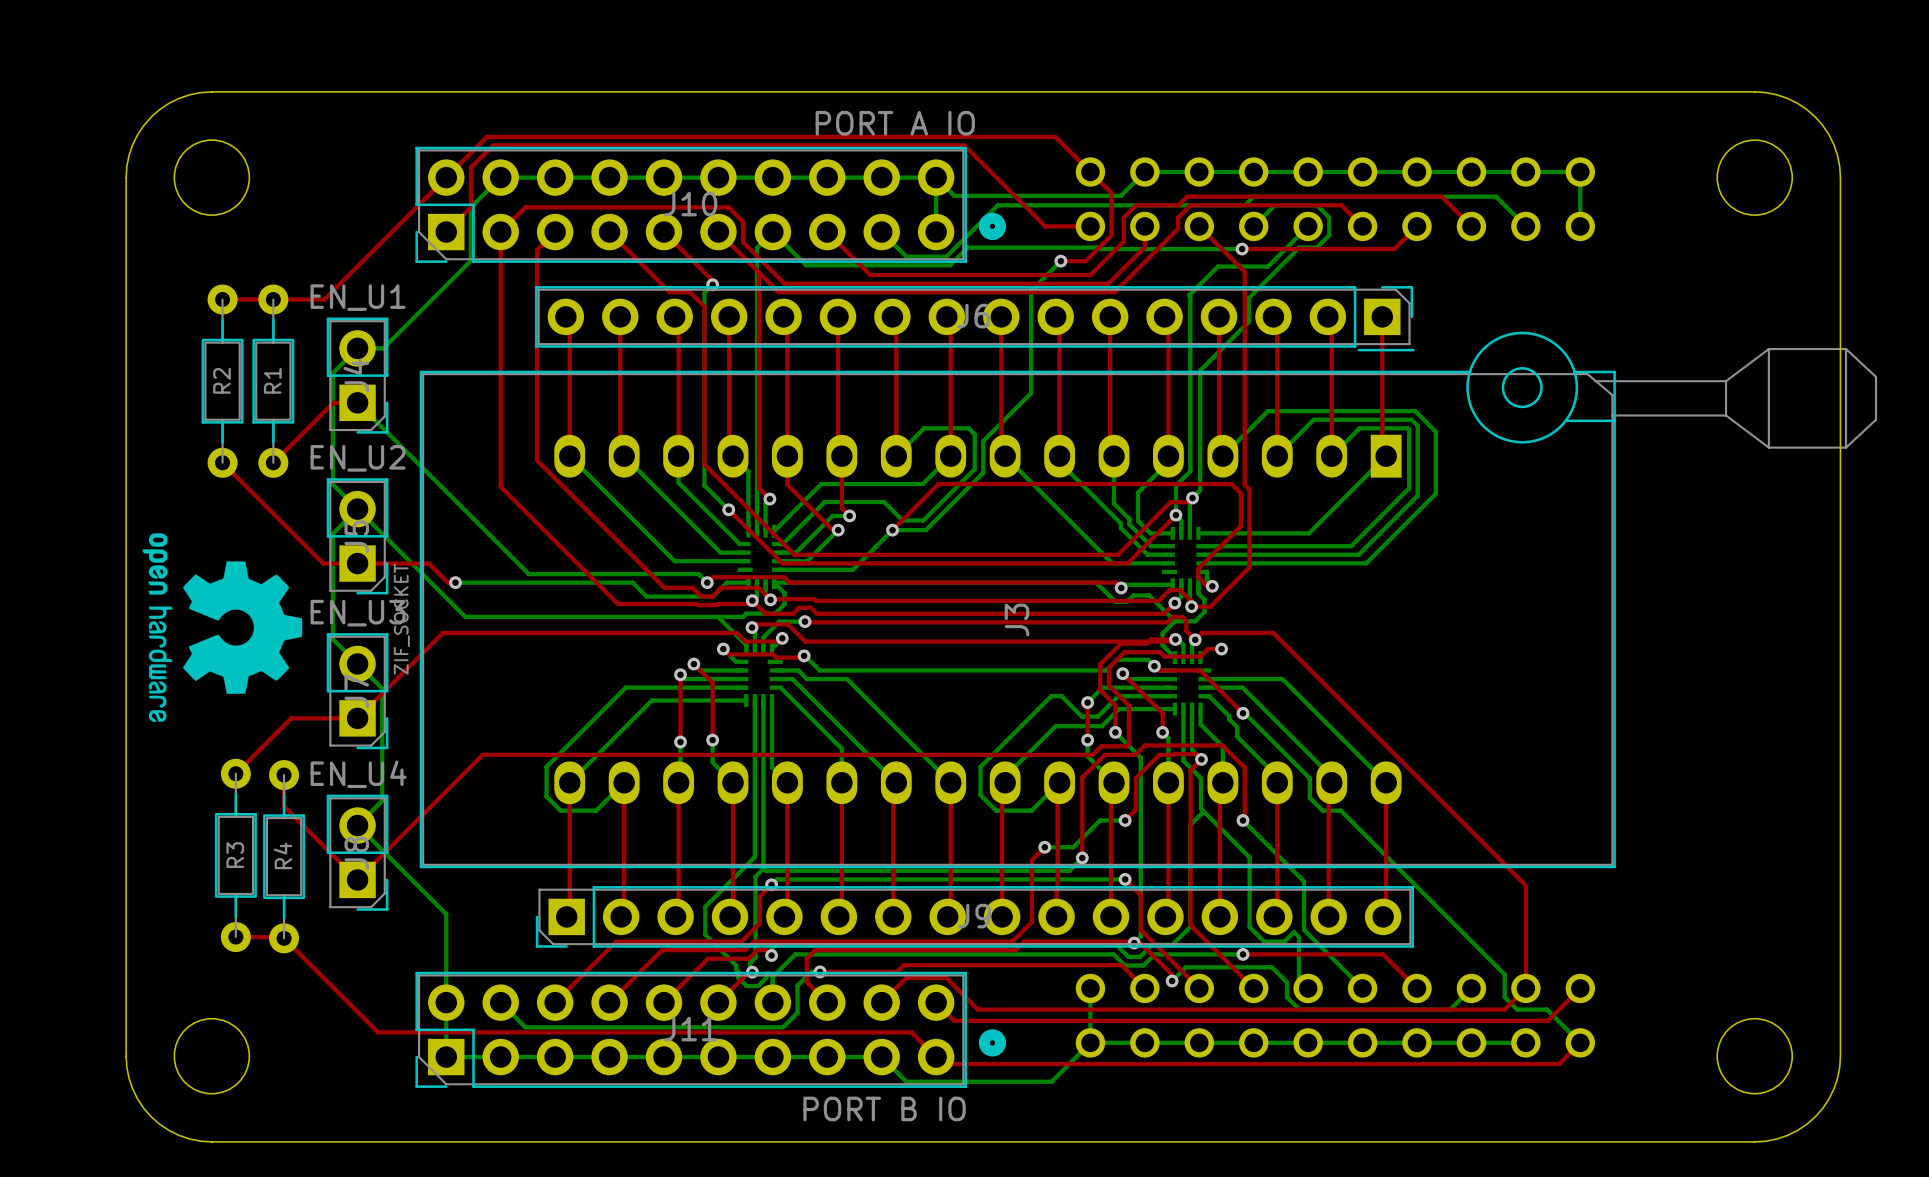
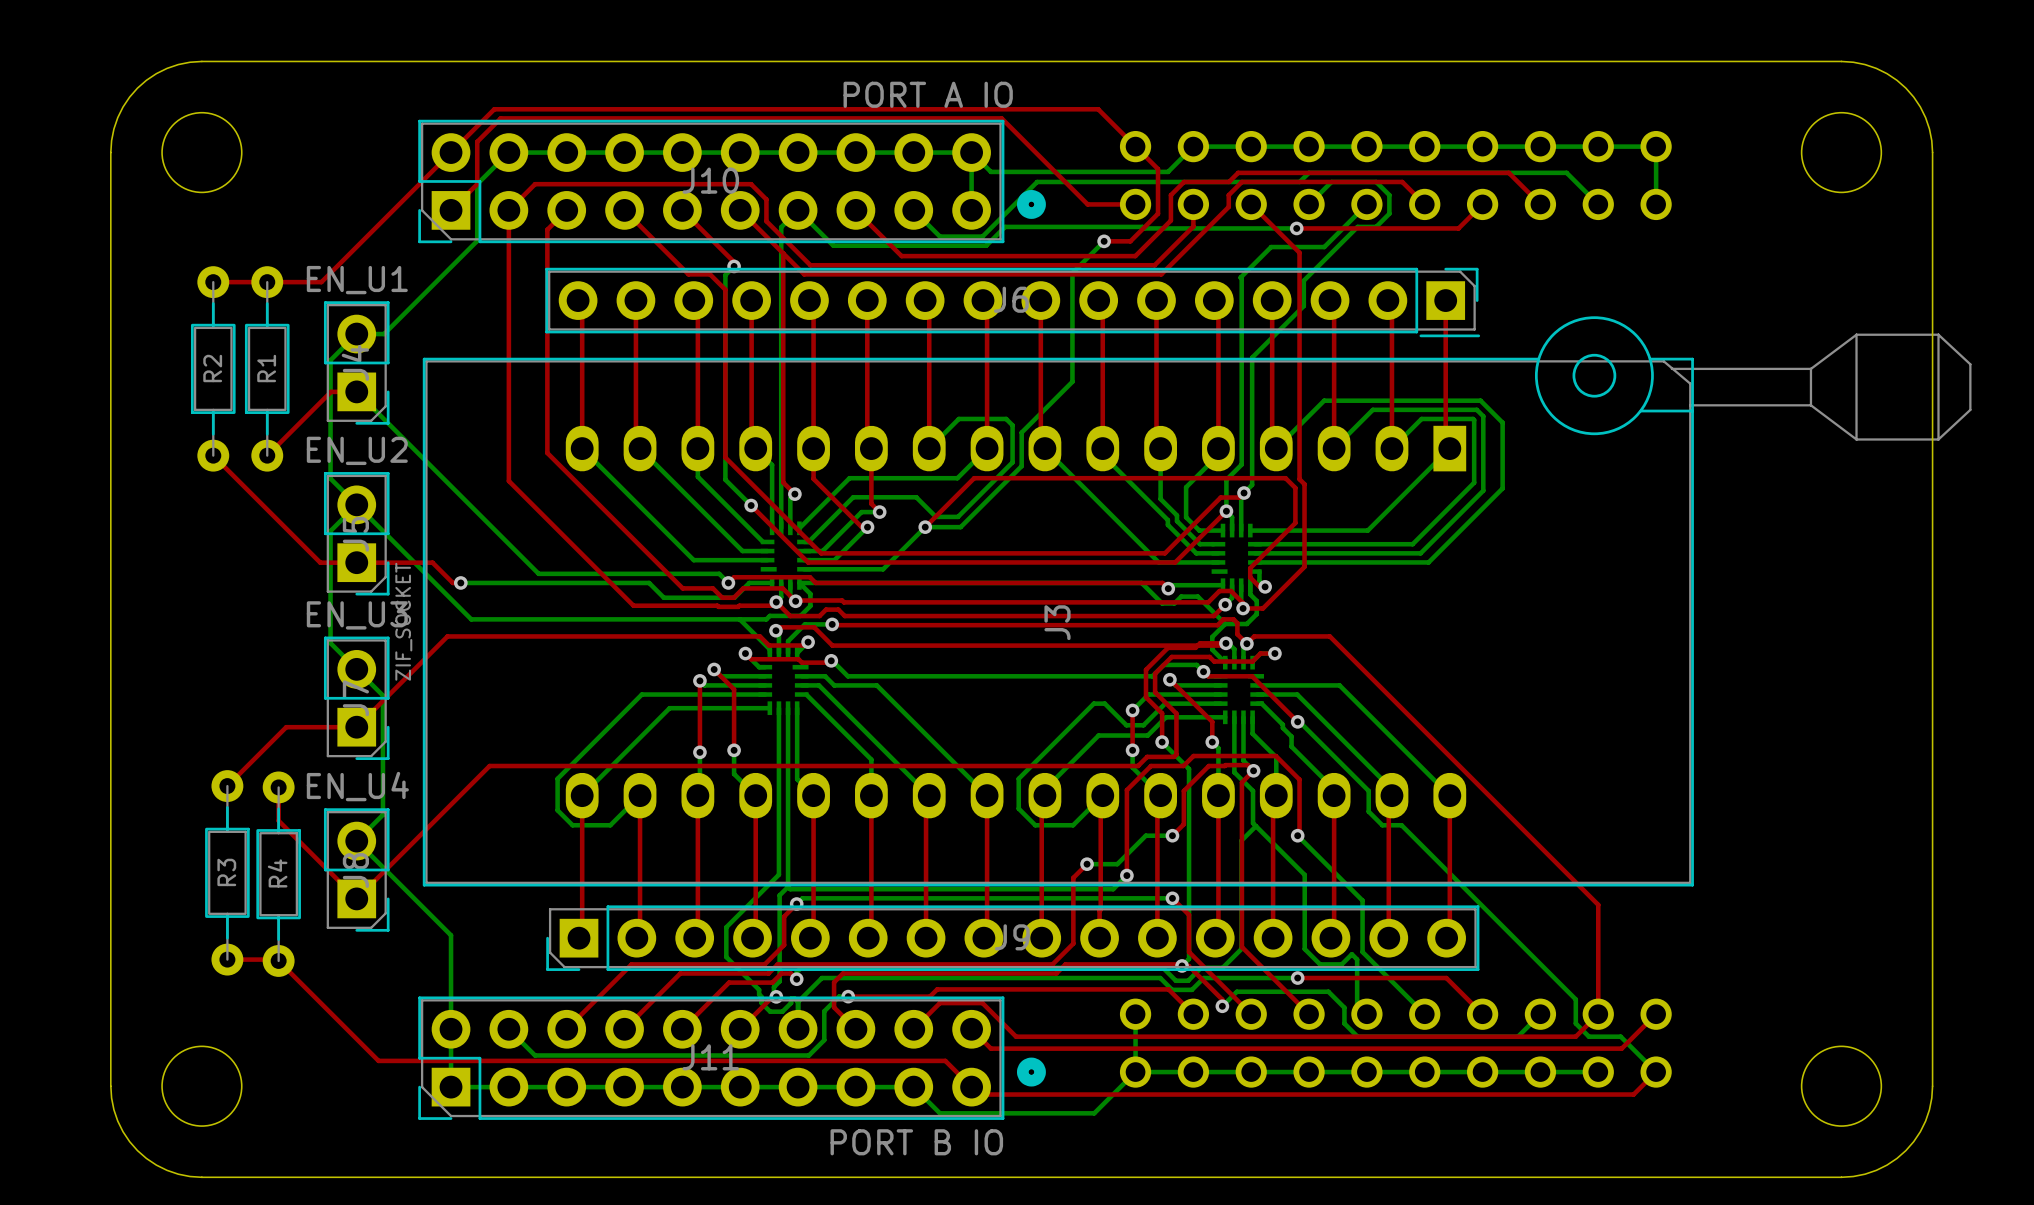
drawing: [142, 533, 303, 722] -> none

